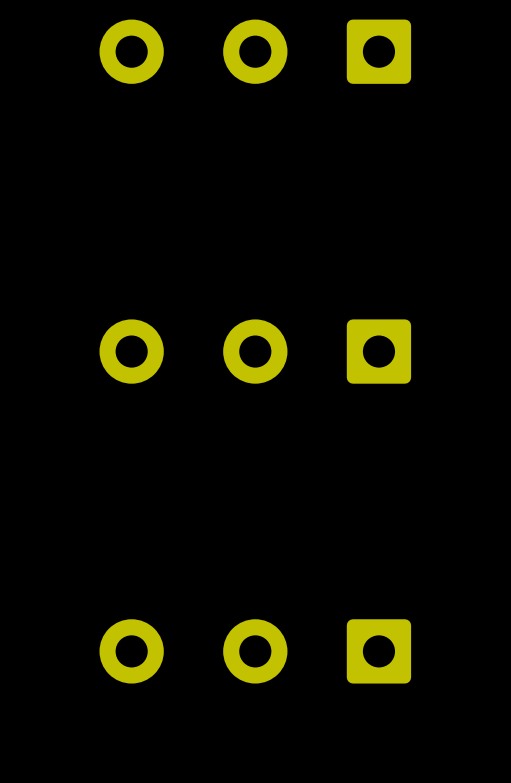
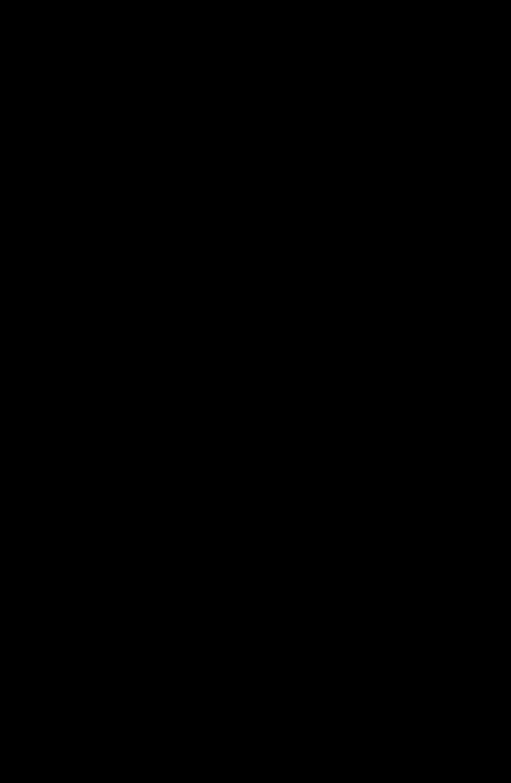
part: (255, 51) -> none
part: (255, 351) -> none
part: (255, 651) -> none

